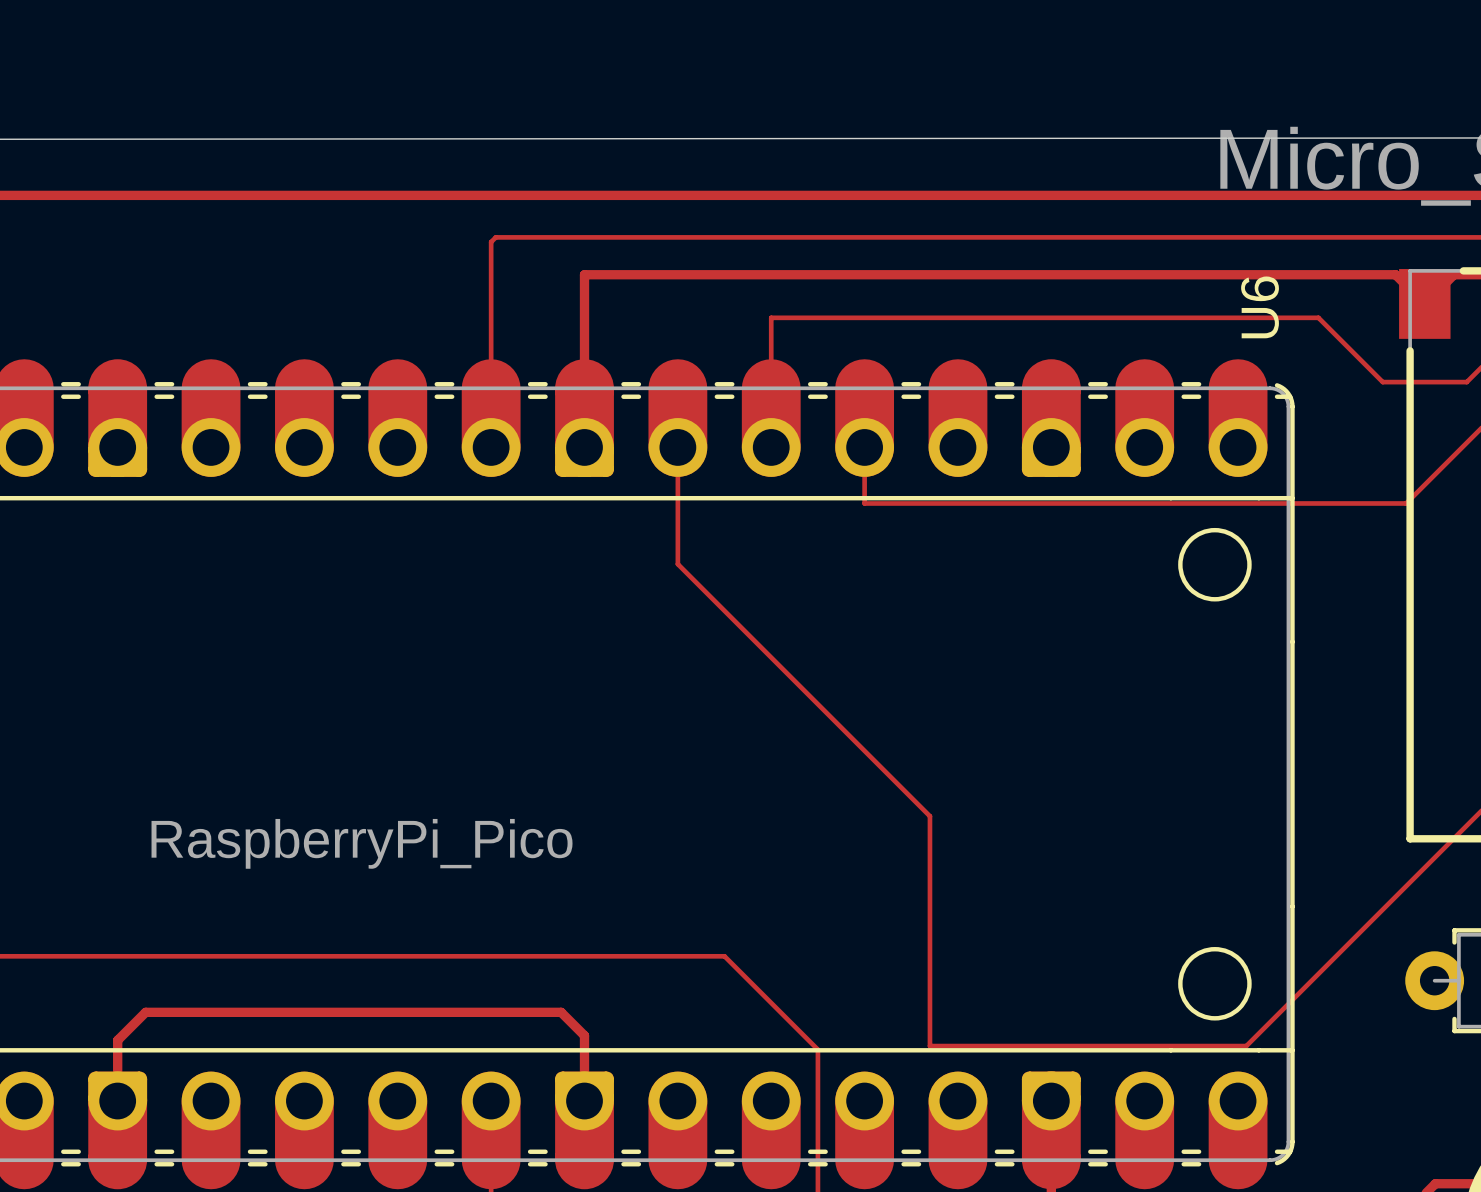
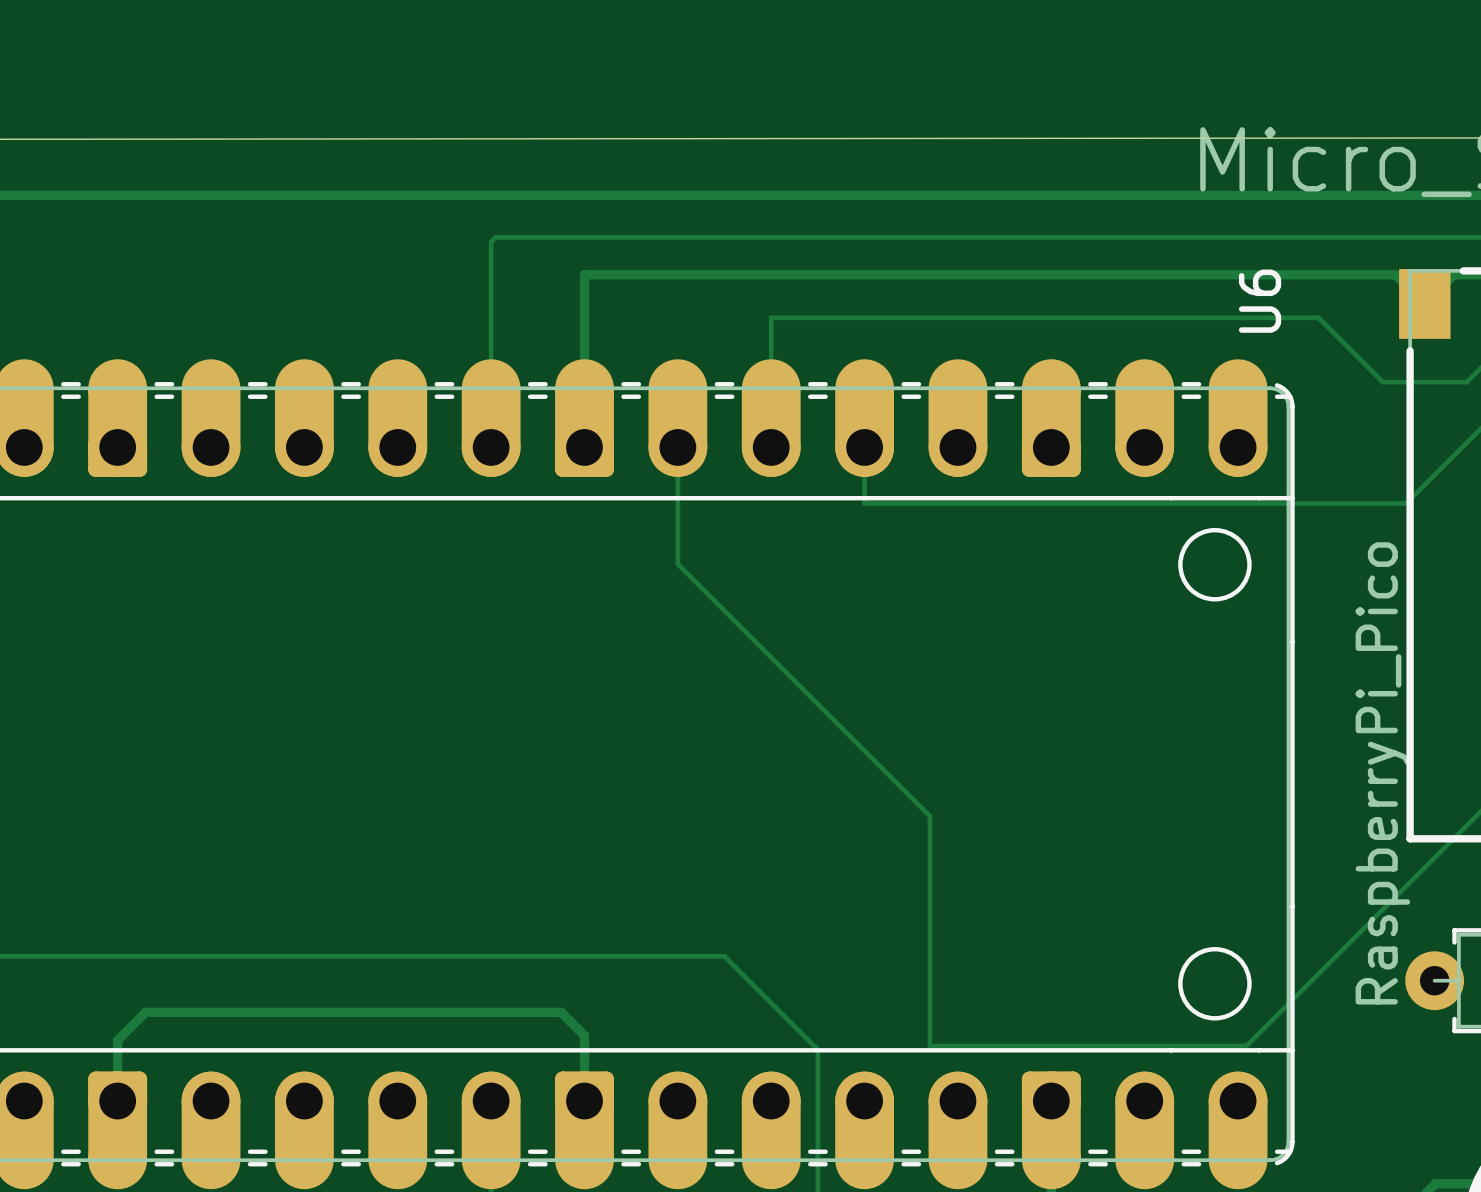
U6 value rotation: 0° (362, 843) -> 90° counterclockwise (1382, 773)
U6 value position: RaspberryPi_Pico (362, 843) -> RaspberryPi_Pico (1382, 773)

